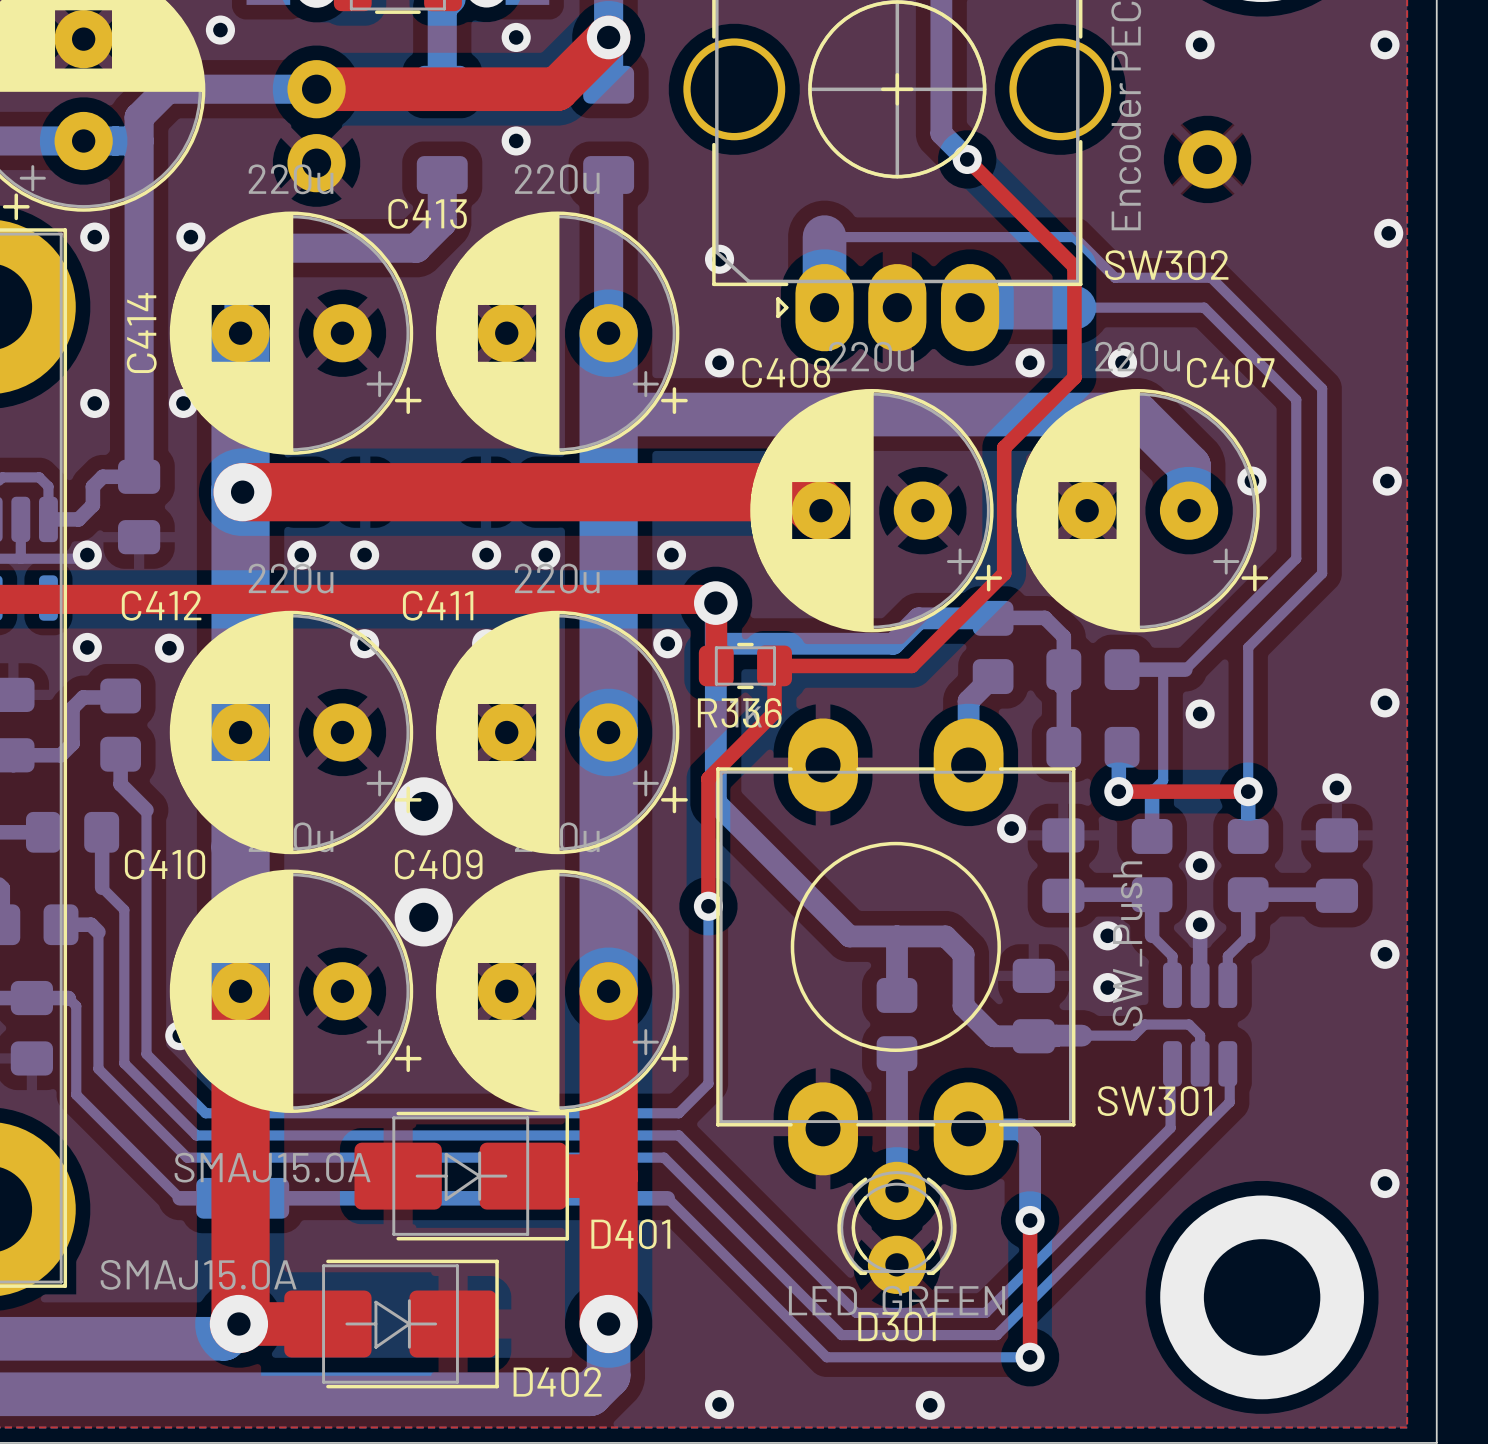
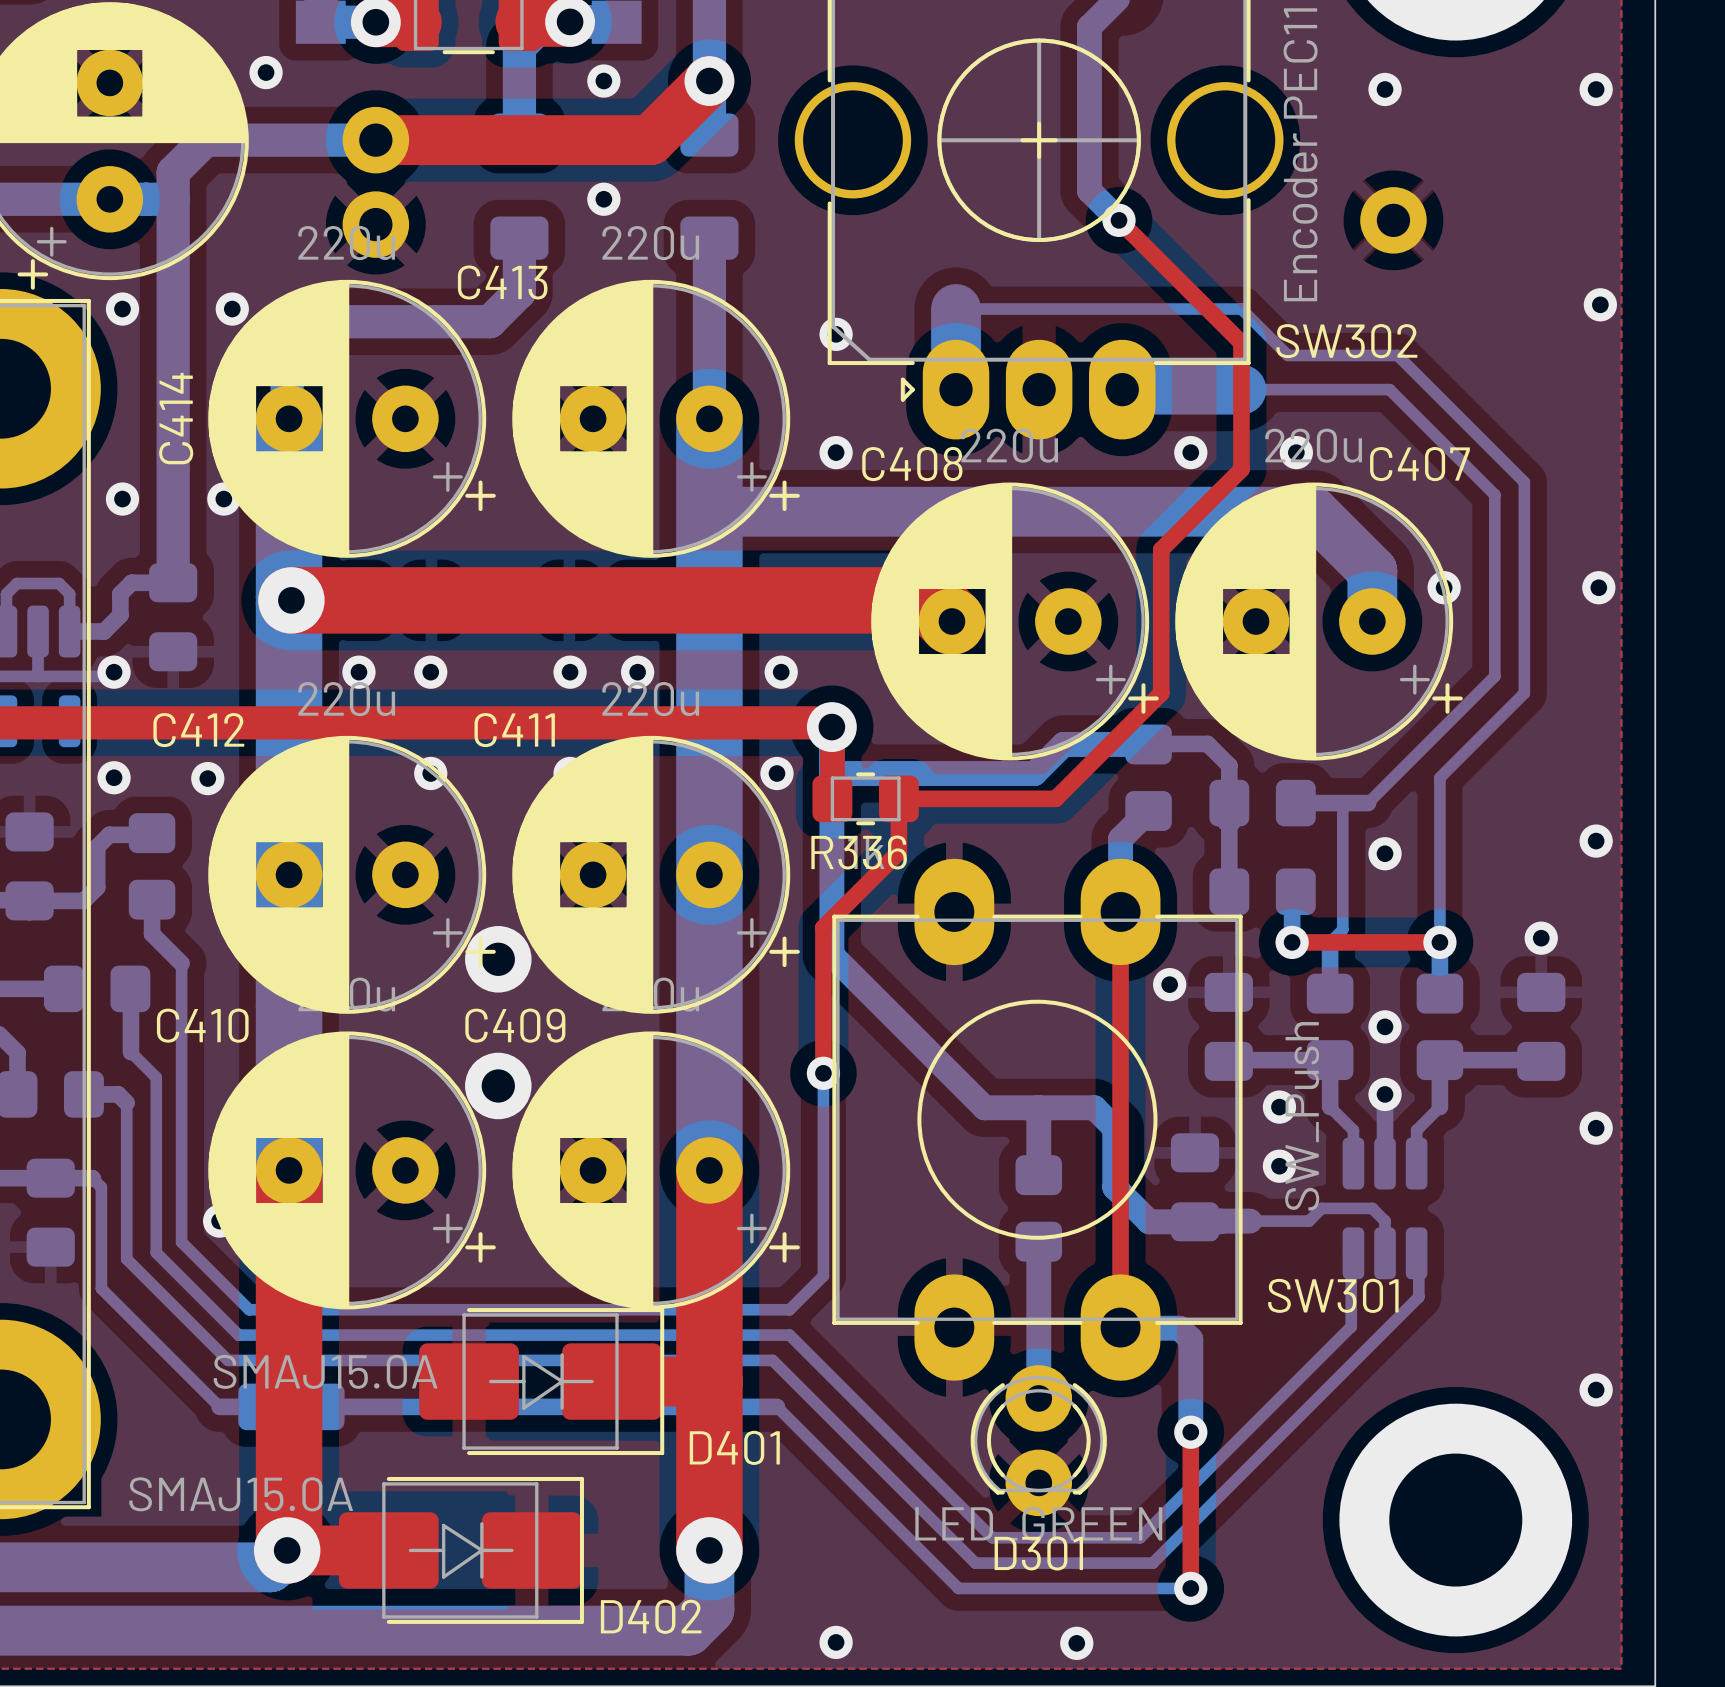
top track: none -> (1120, 911) (1120, 1327)

